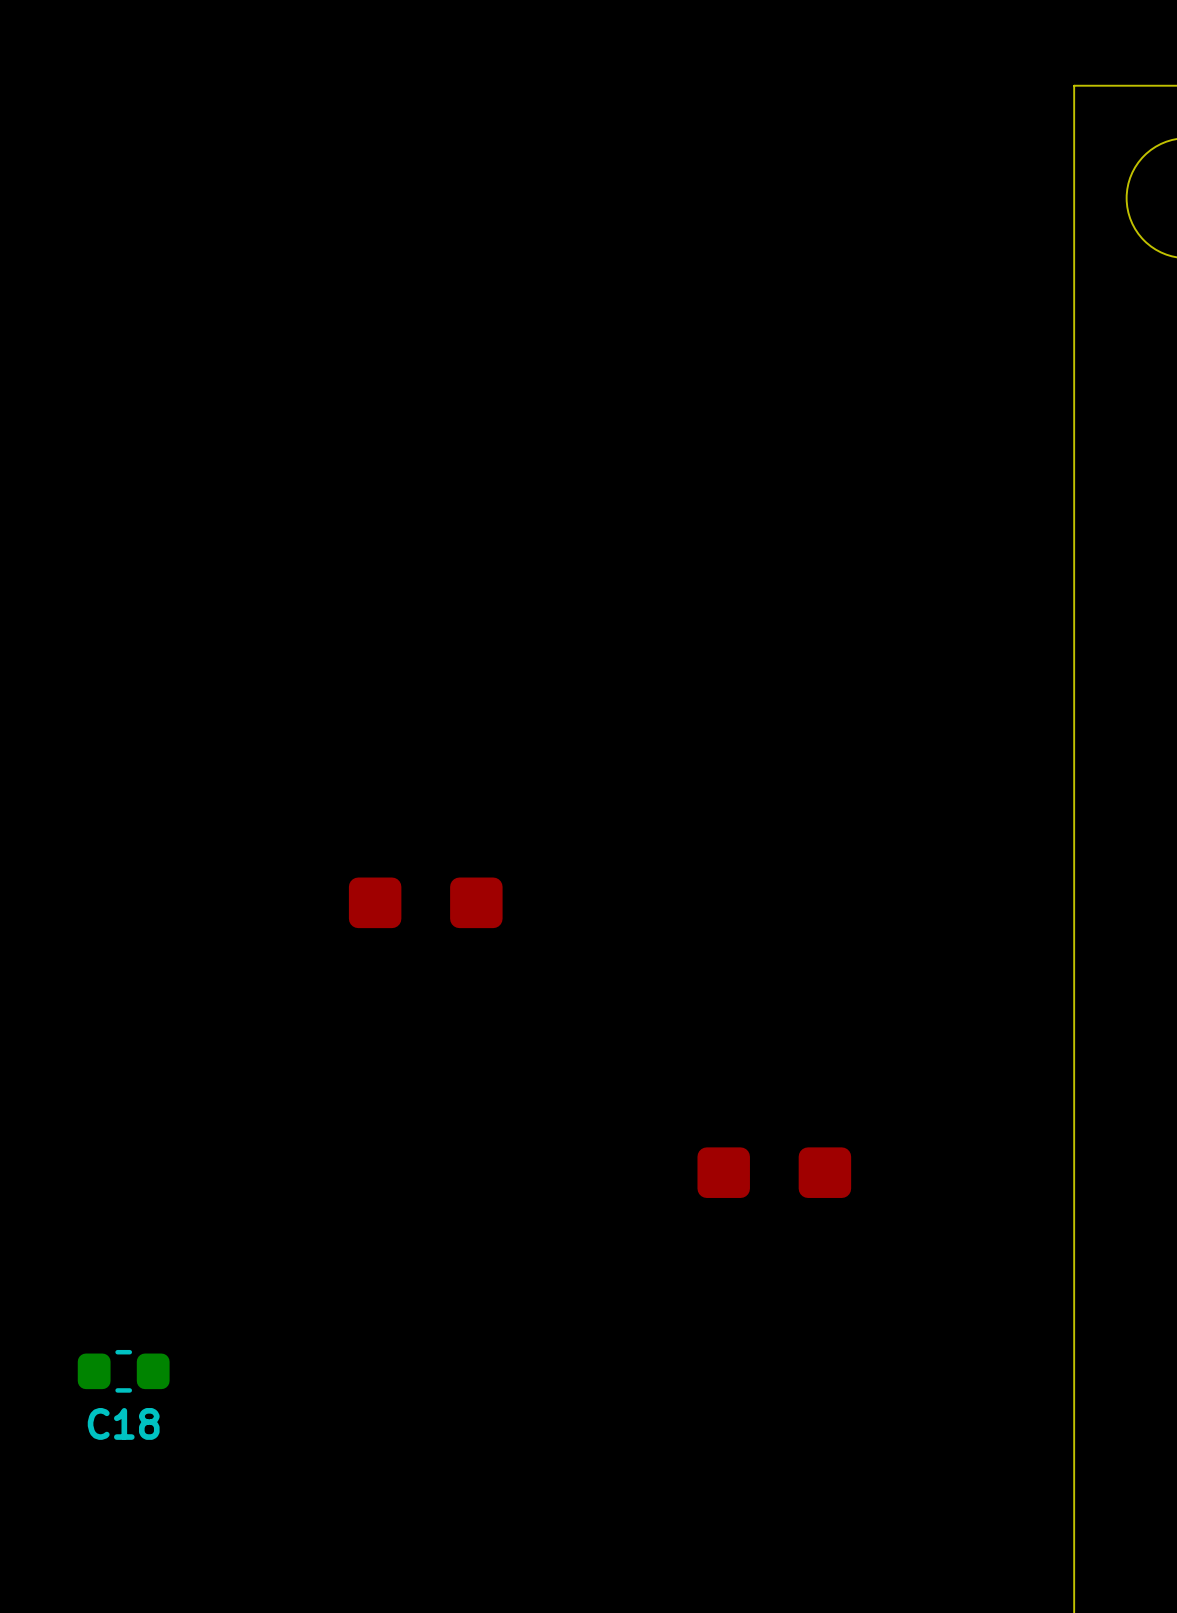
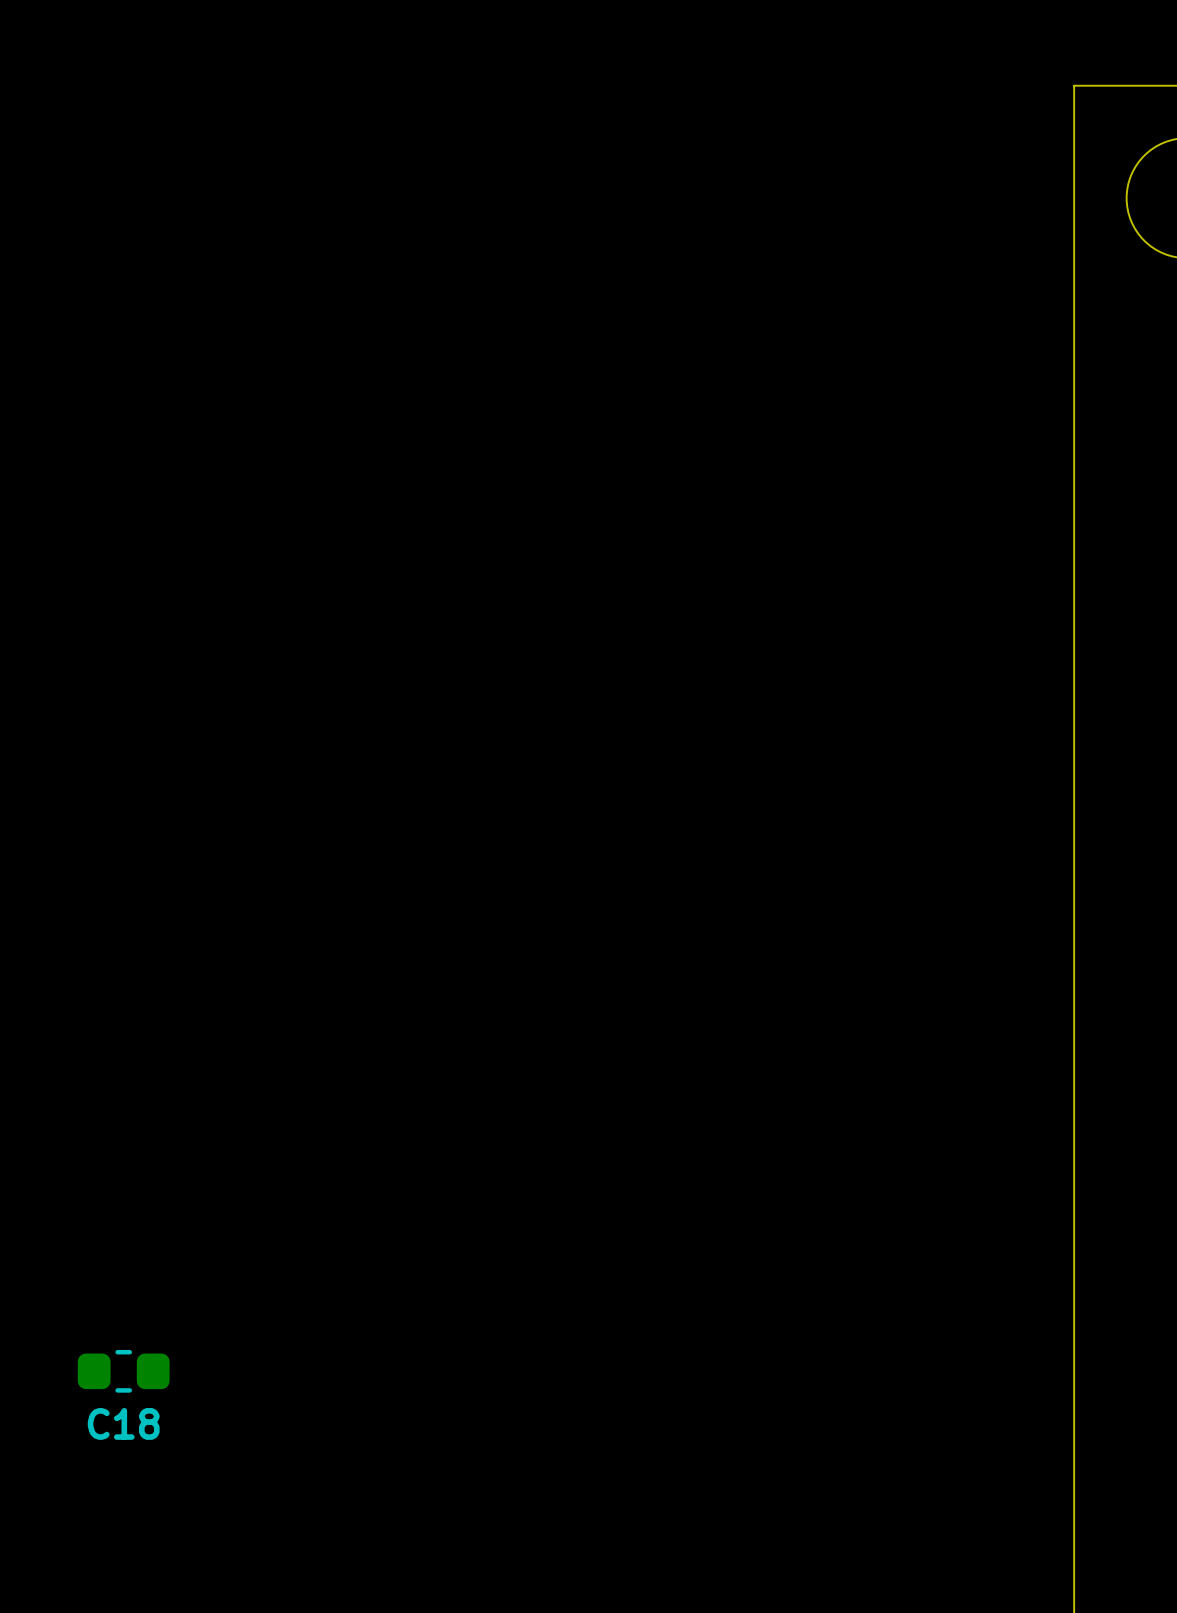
part: (425, 902) -> none
part: (774, 1172) -> none

